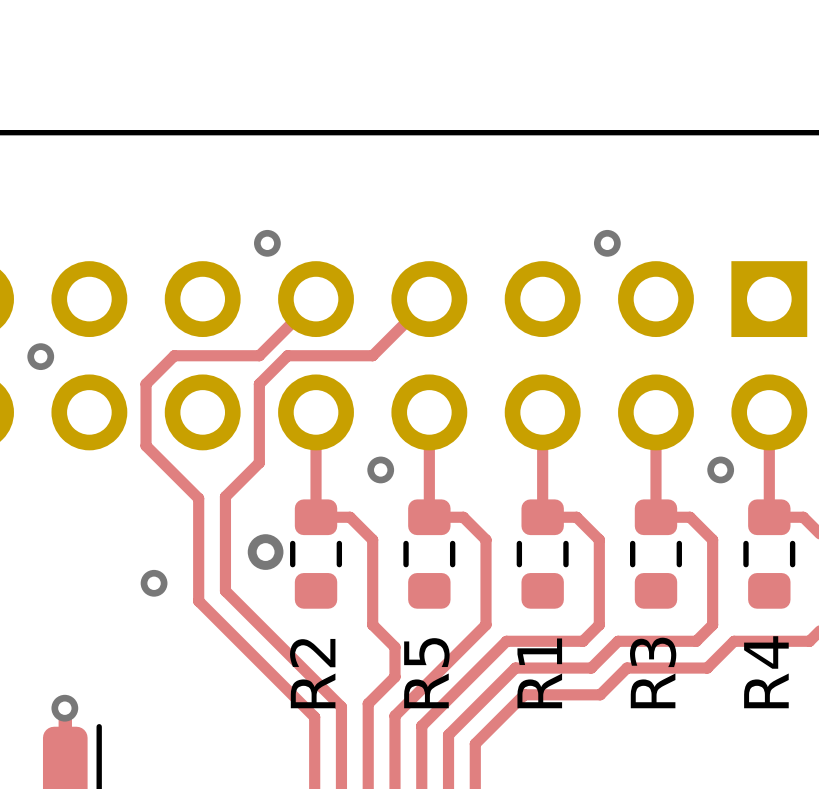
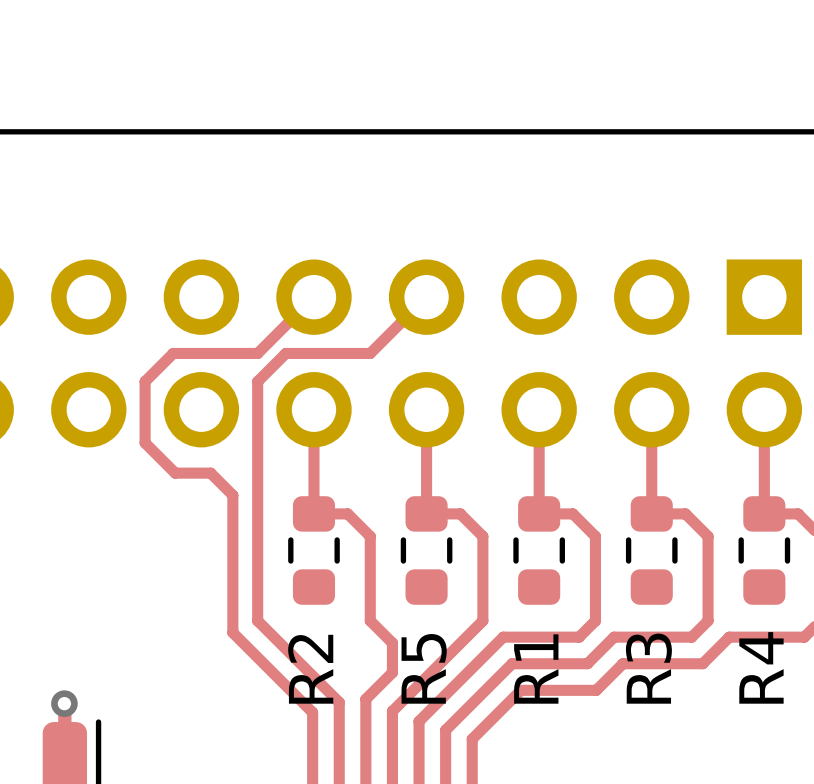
via: (267, 243) -> none
via: (607, 243) -> none
via: (40, 356) -> none
top track: (259, 462) (225, 496) (225, 590) (259, 624) -> (257, 459) (257, 620)
via: (380, 469) -> none
via: (720, 469) -> none
top track: (176, 476) (198, 498) (198, 601) (234, 636) -> (175, 473) (210, 473) (232, 495) (232, 632)
via: (265, 552) -> none
via: (154, 583) -> none

